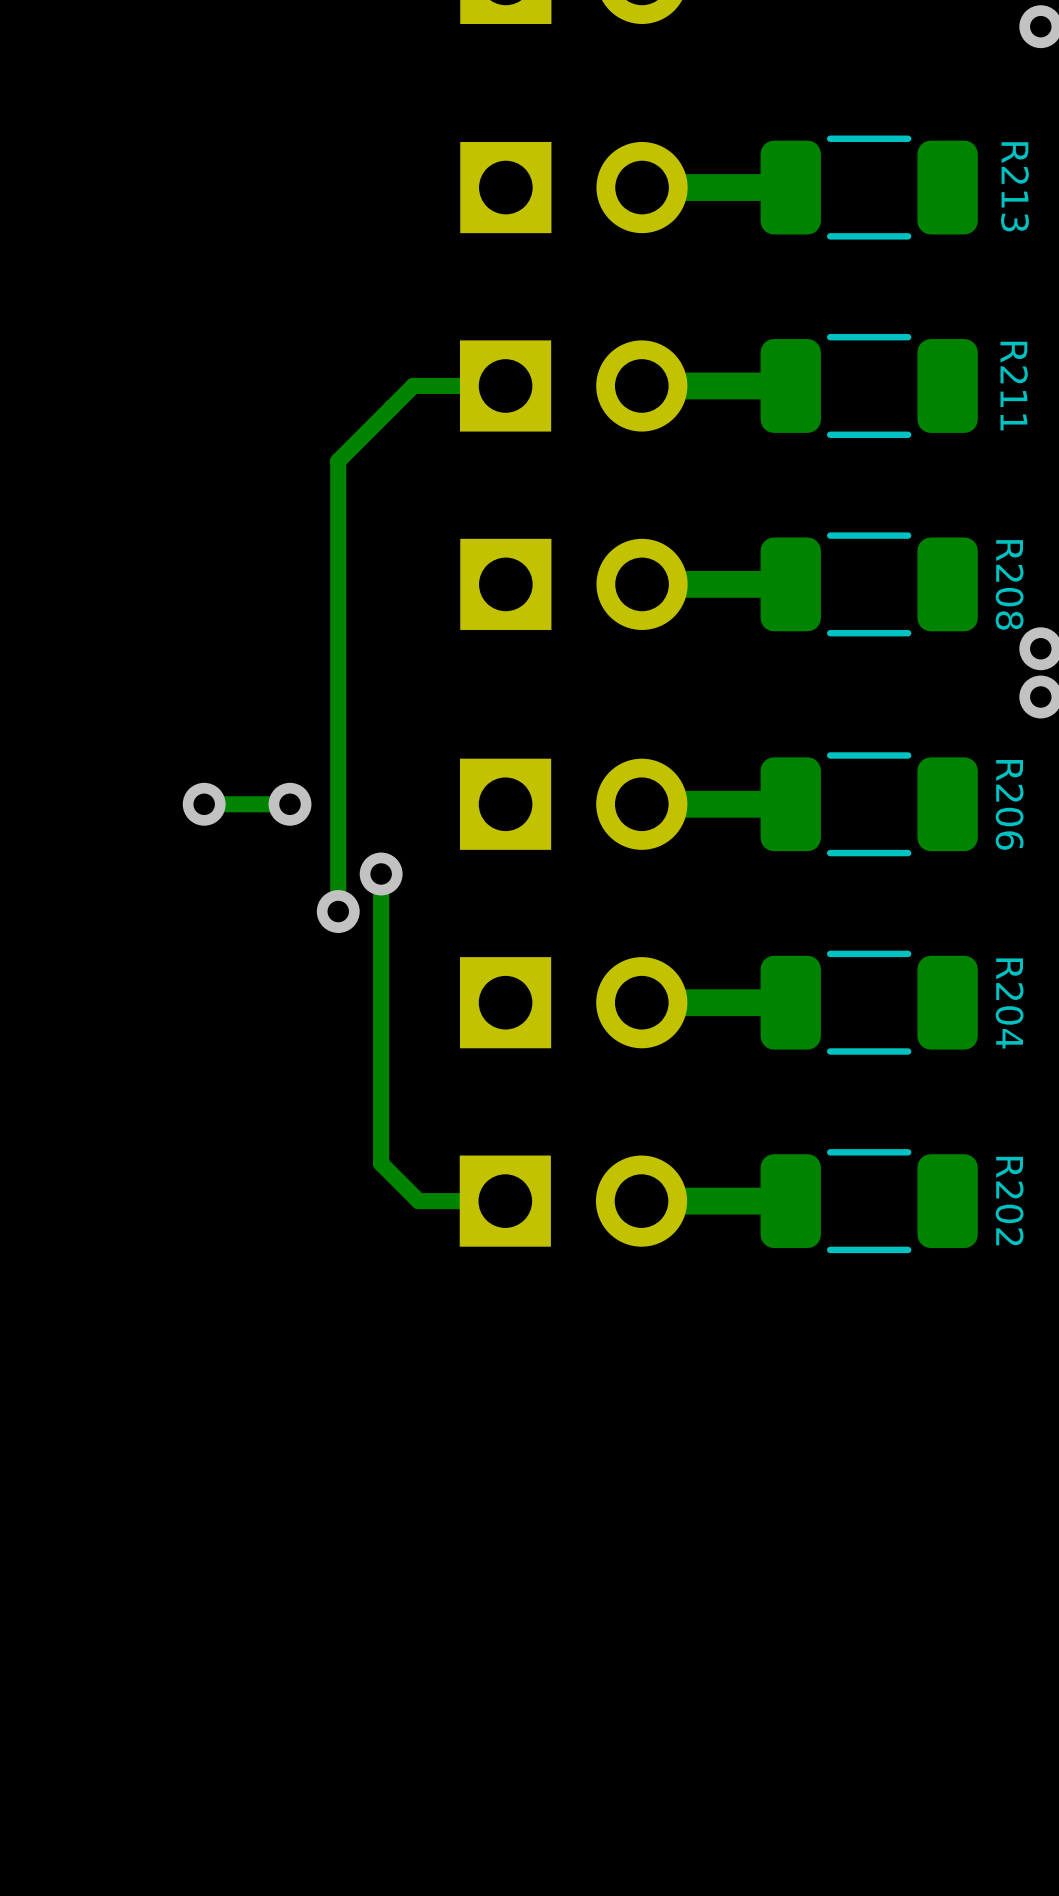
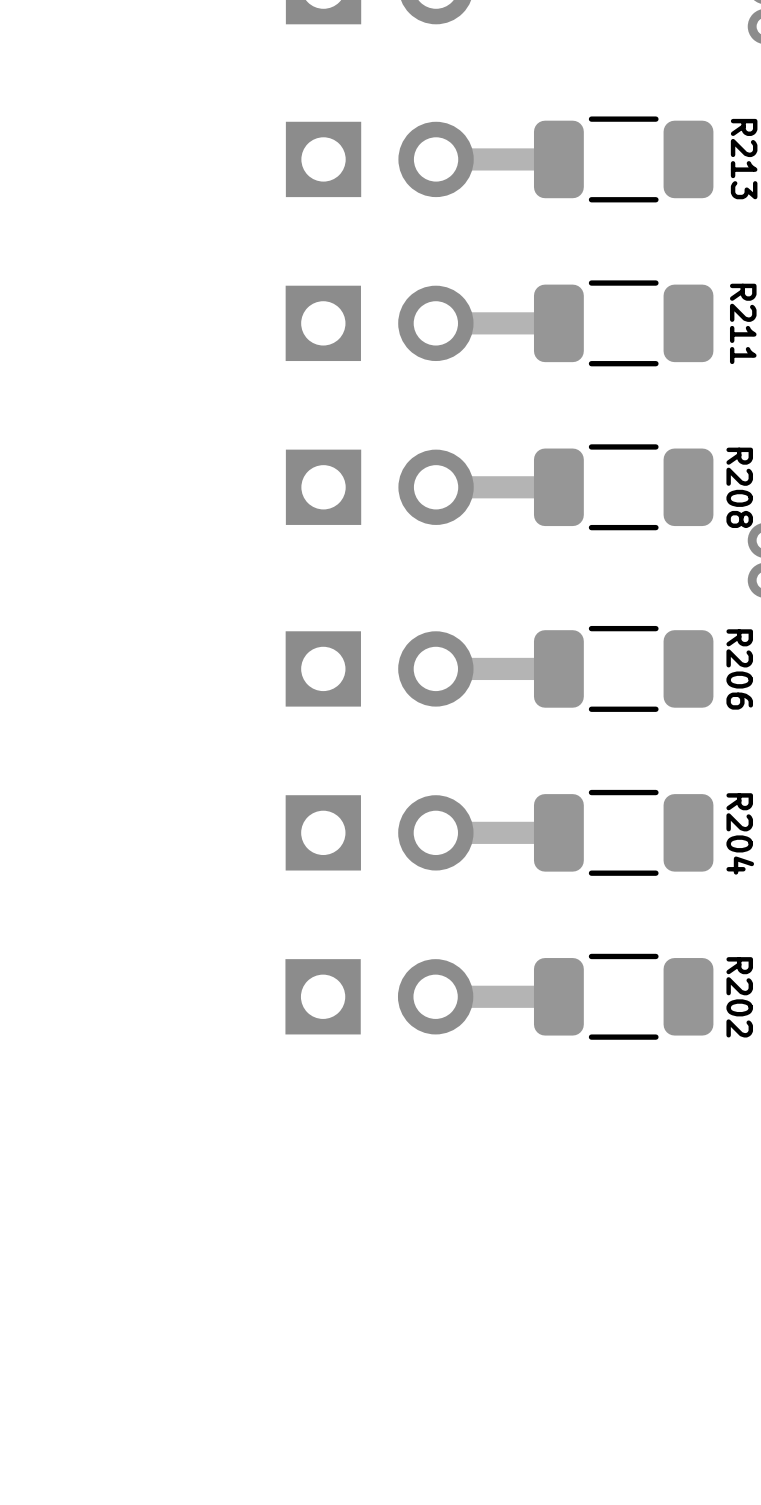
track: (505, 385) (413, 385) (338, 461) (338, 911) -> none
via: (204, 804) -> none
track: (289, 804) (204, 804) -> none
via: (289, 804) -> none
track: (381, 873) (381, 1163) (418, 1201) (505, 1201) -> none
via: (381, 873) -> none
via: (338, 911) -> none

